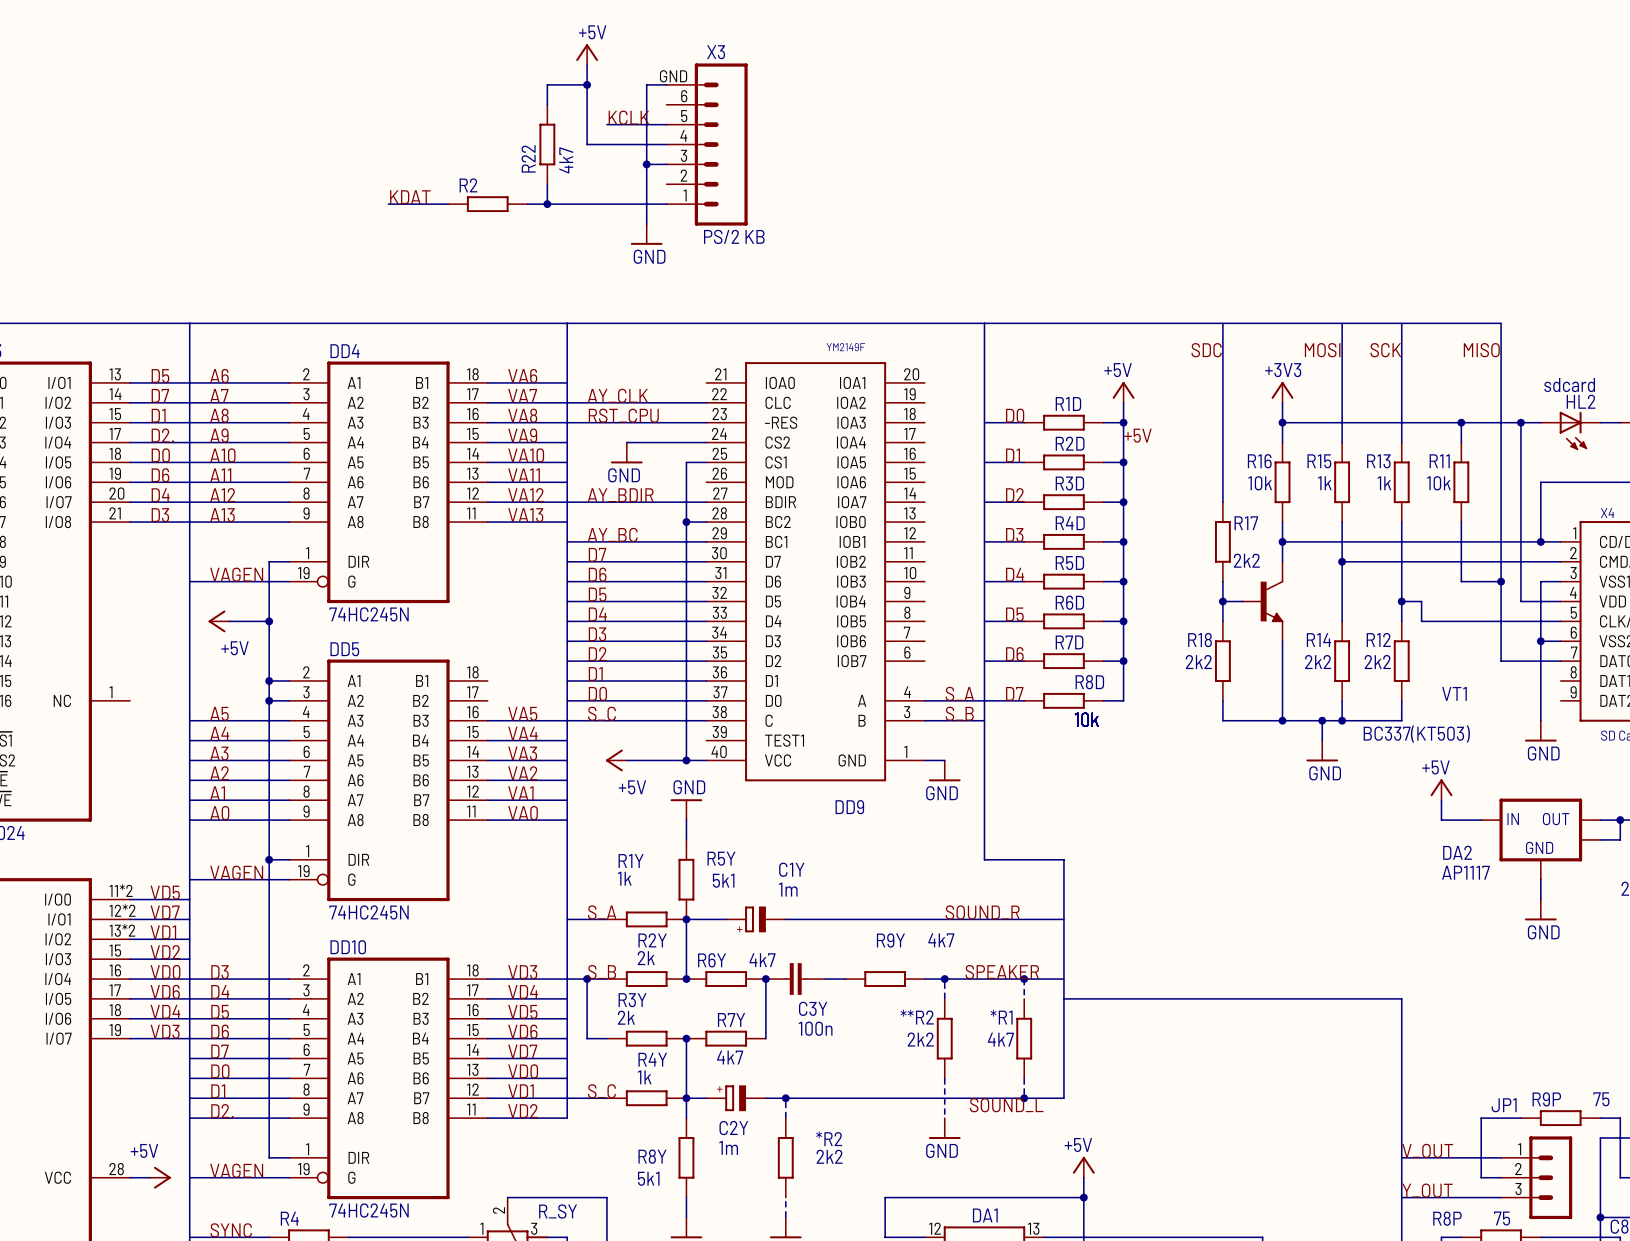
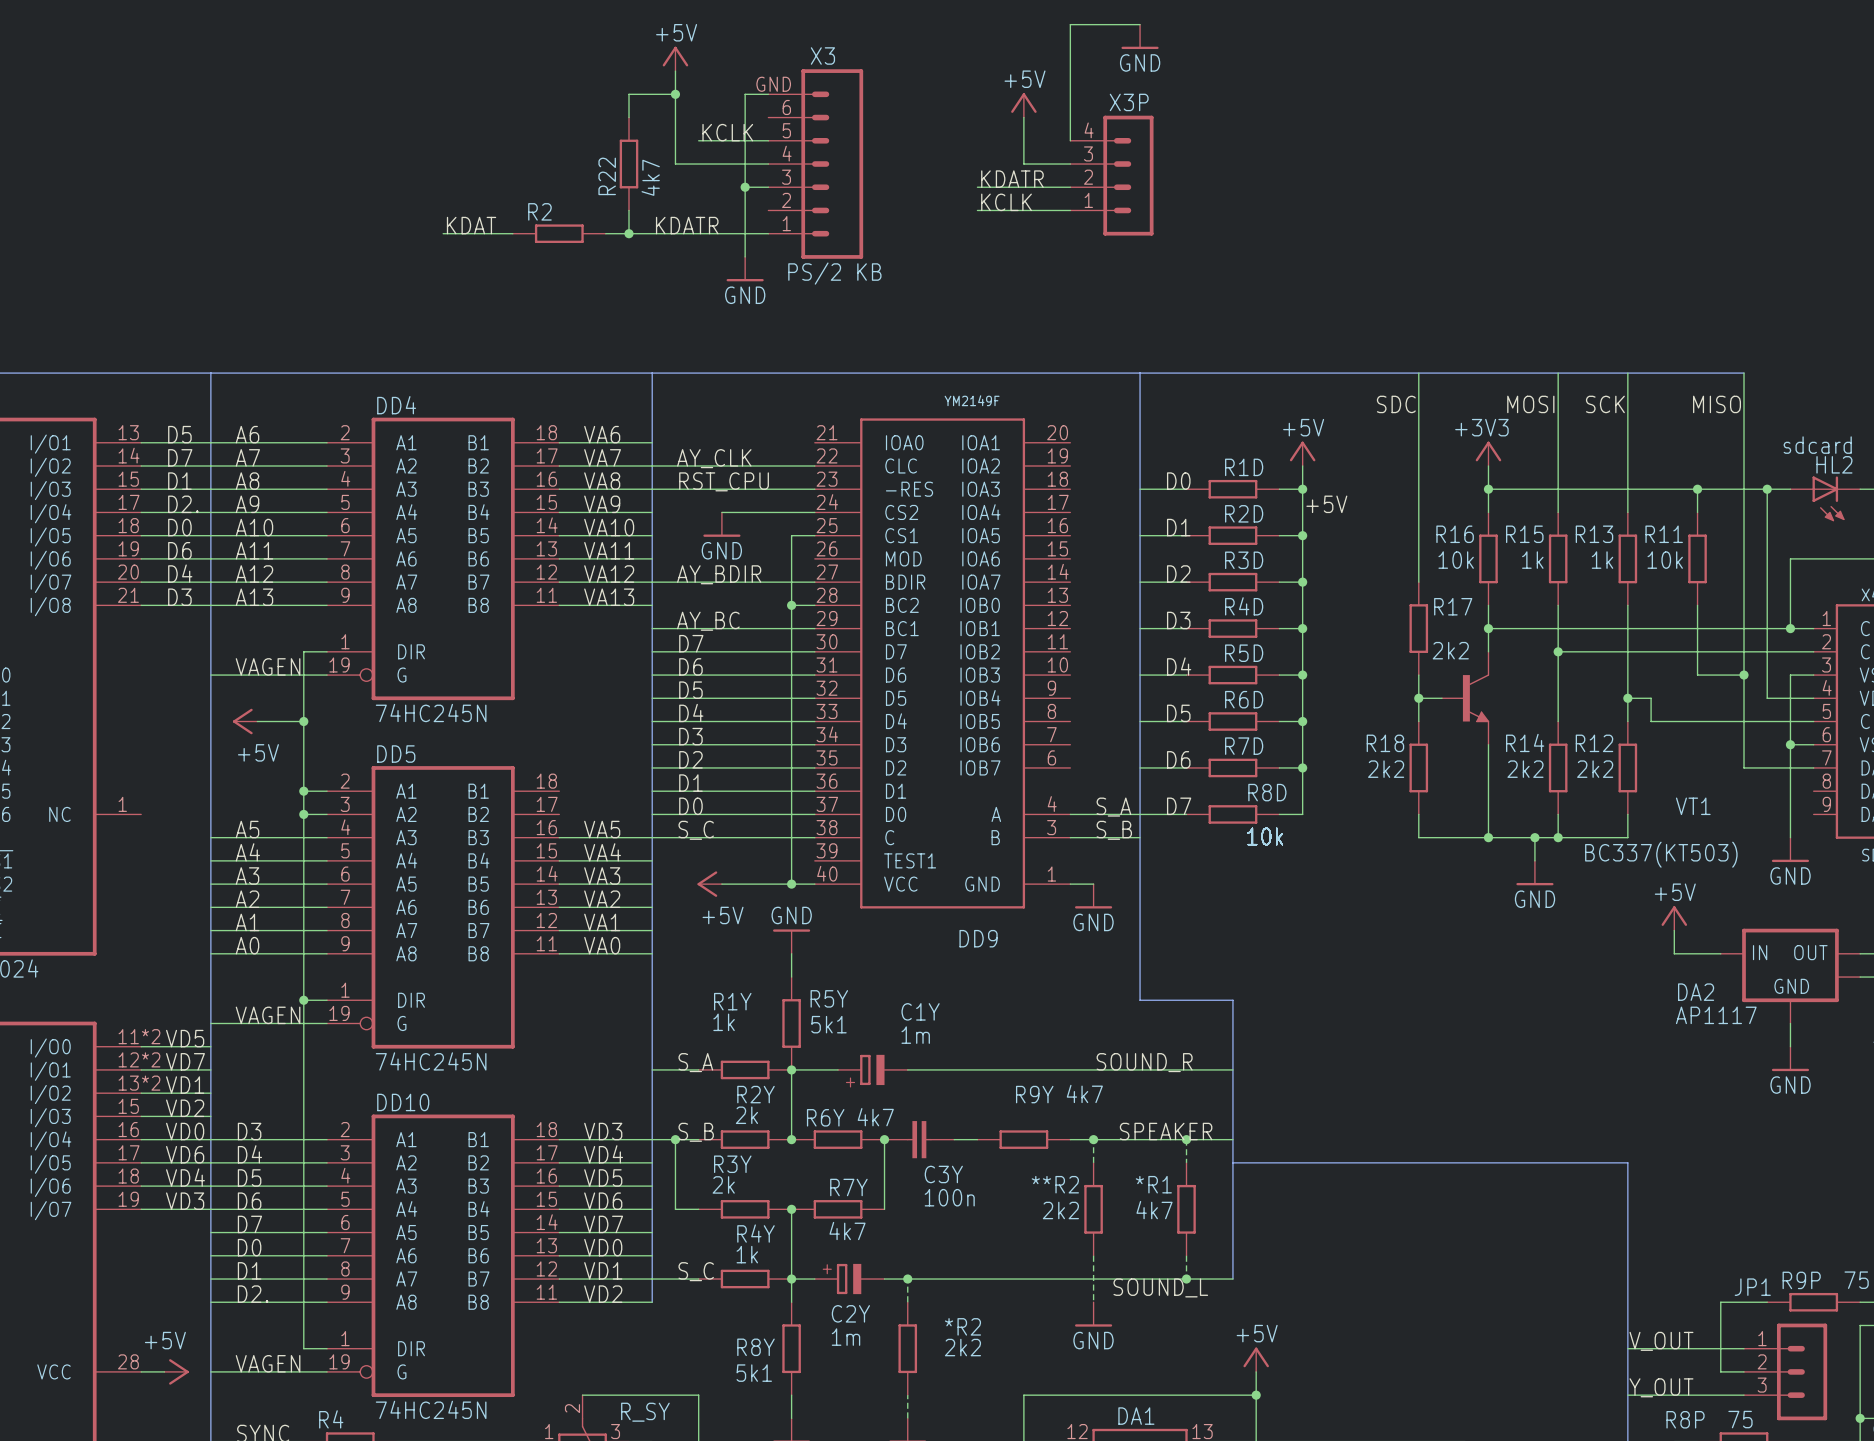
wire: none -> (1140, 24) (1070, 24) (1070, 140)
power symbol: none -> GND (1140, 36)
power symbol: none -> +5V (1023, 105)
wire: none -> (1023, 117) (1023, 164) (1070, 164)
X3P: none -> (1111, 175)
label: none -> KDATR (1012, 179)
wire: none -> (977, 187) (1070, 187)
label: none -> KCLK (1006, 202)
wire: none -> (977, 210) (1070, 210)
label: none -> KDATR (687, 225)

